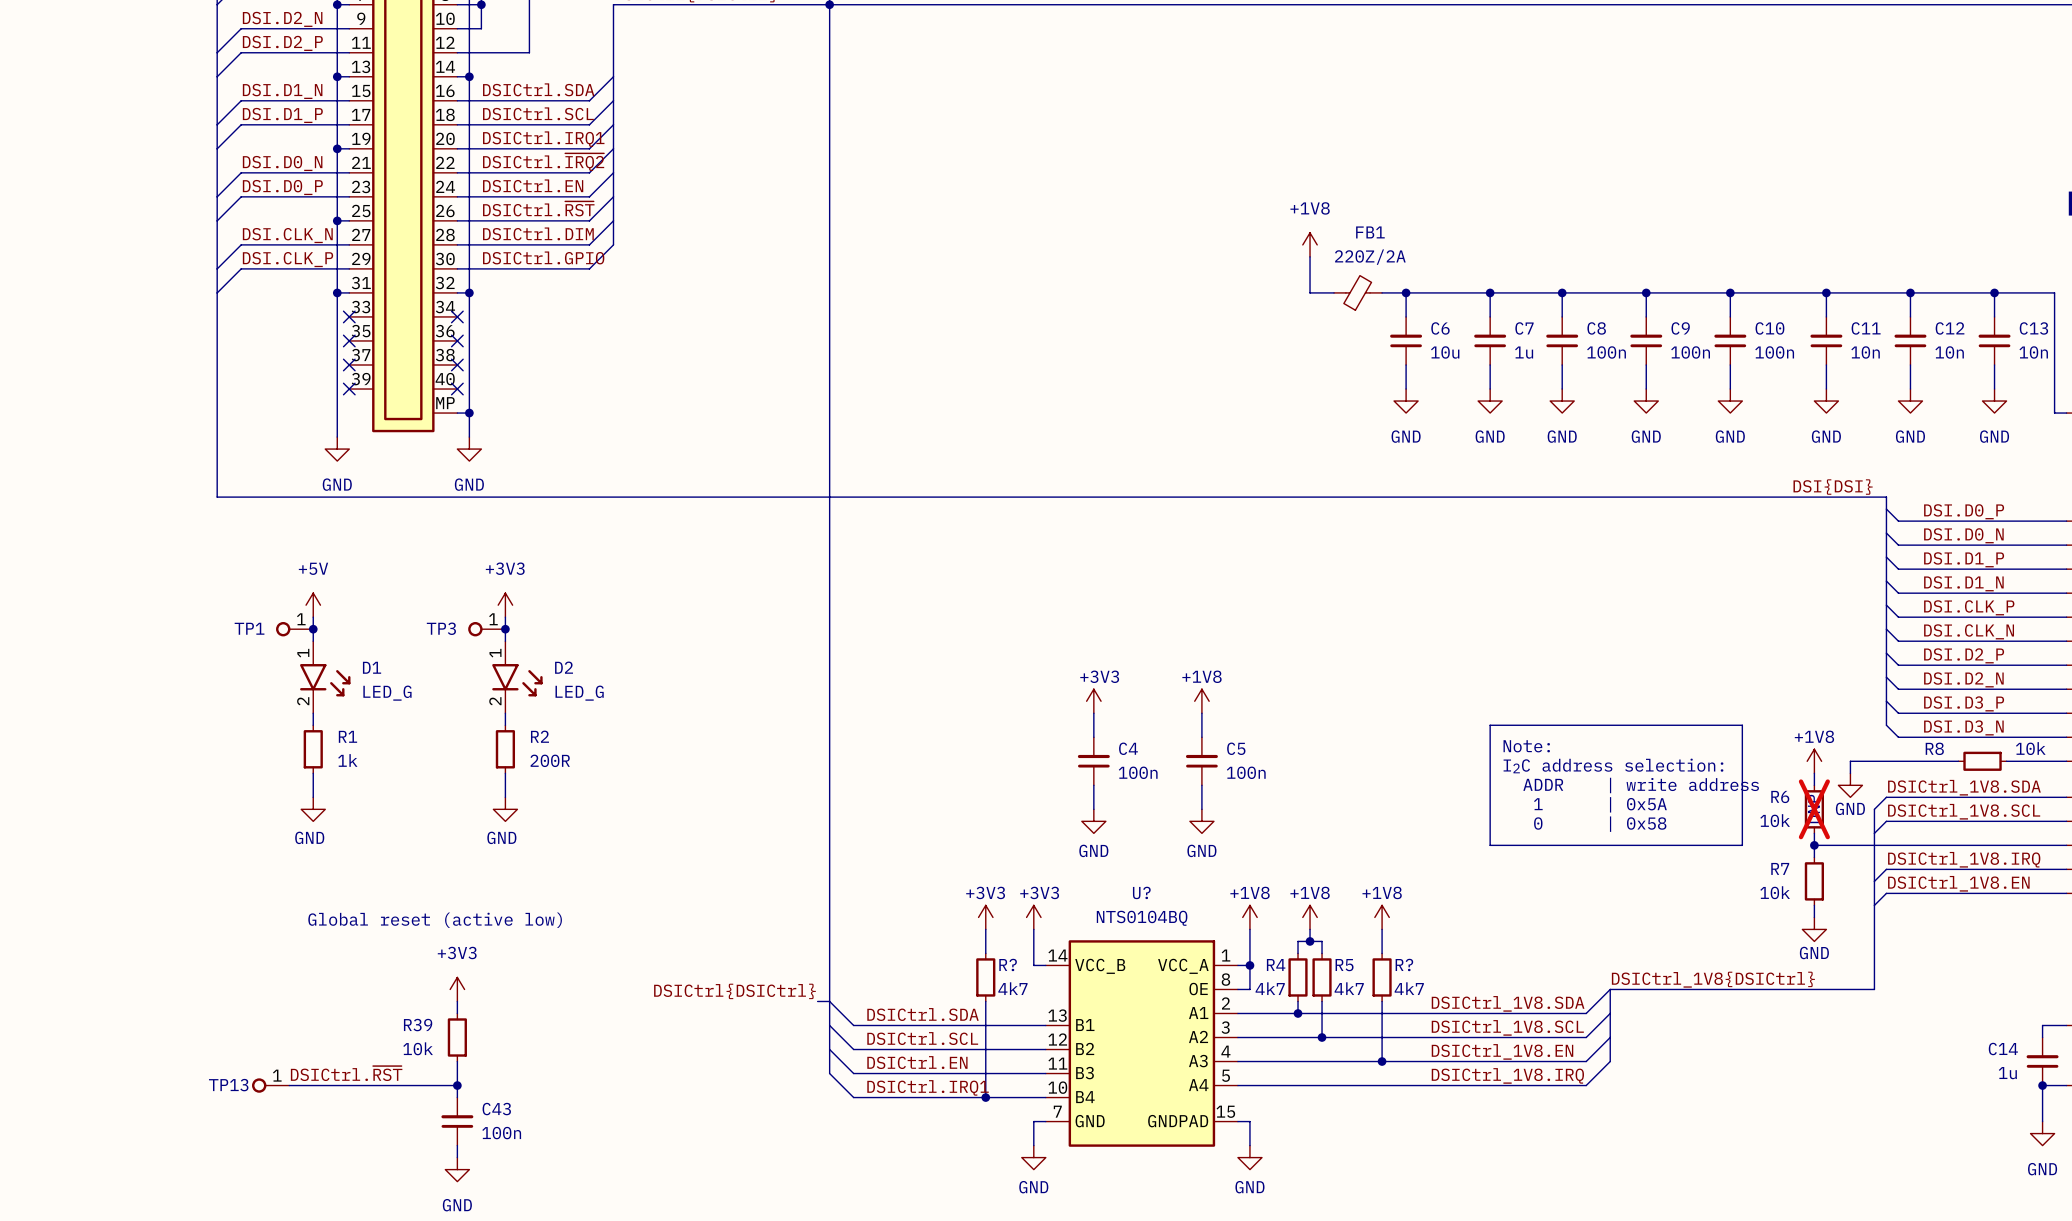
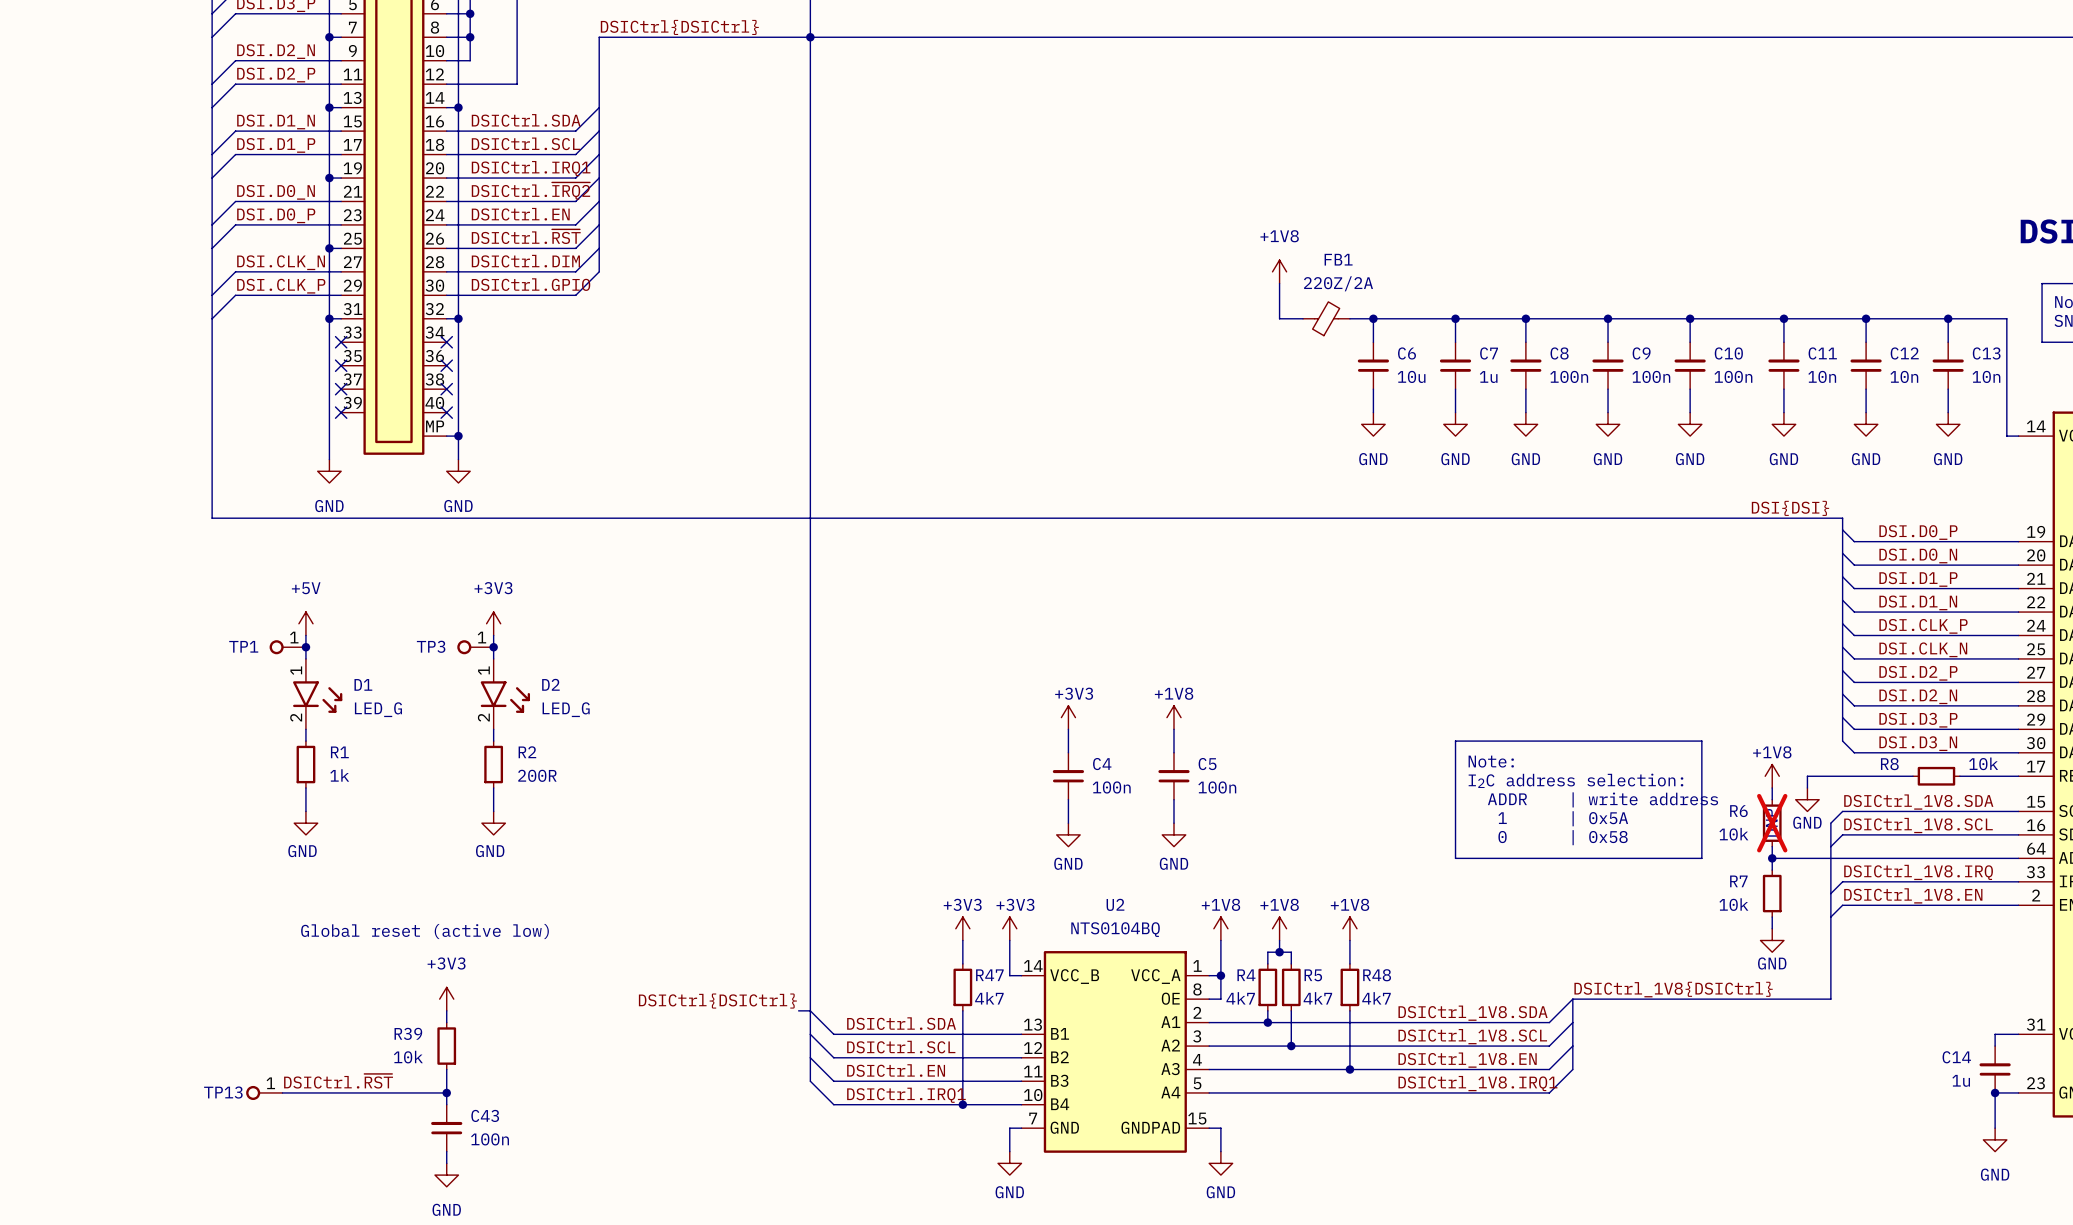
U? name: U? (1141, 892) -> U2 (1115, 904)
R? name: R? (1008, 964) -> R47 (989, 975)
R? name: R? (1404, 964) -> R48 (1377, 975)
label: DSICtrl_1V8.IRQ (1507, 1075) -> DSICtrl_1V8.IRQ1 (1477, 1083)

